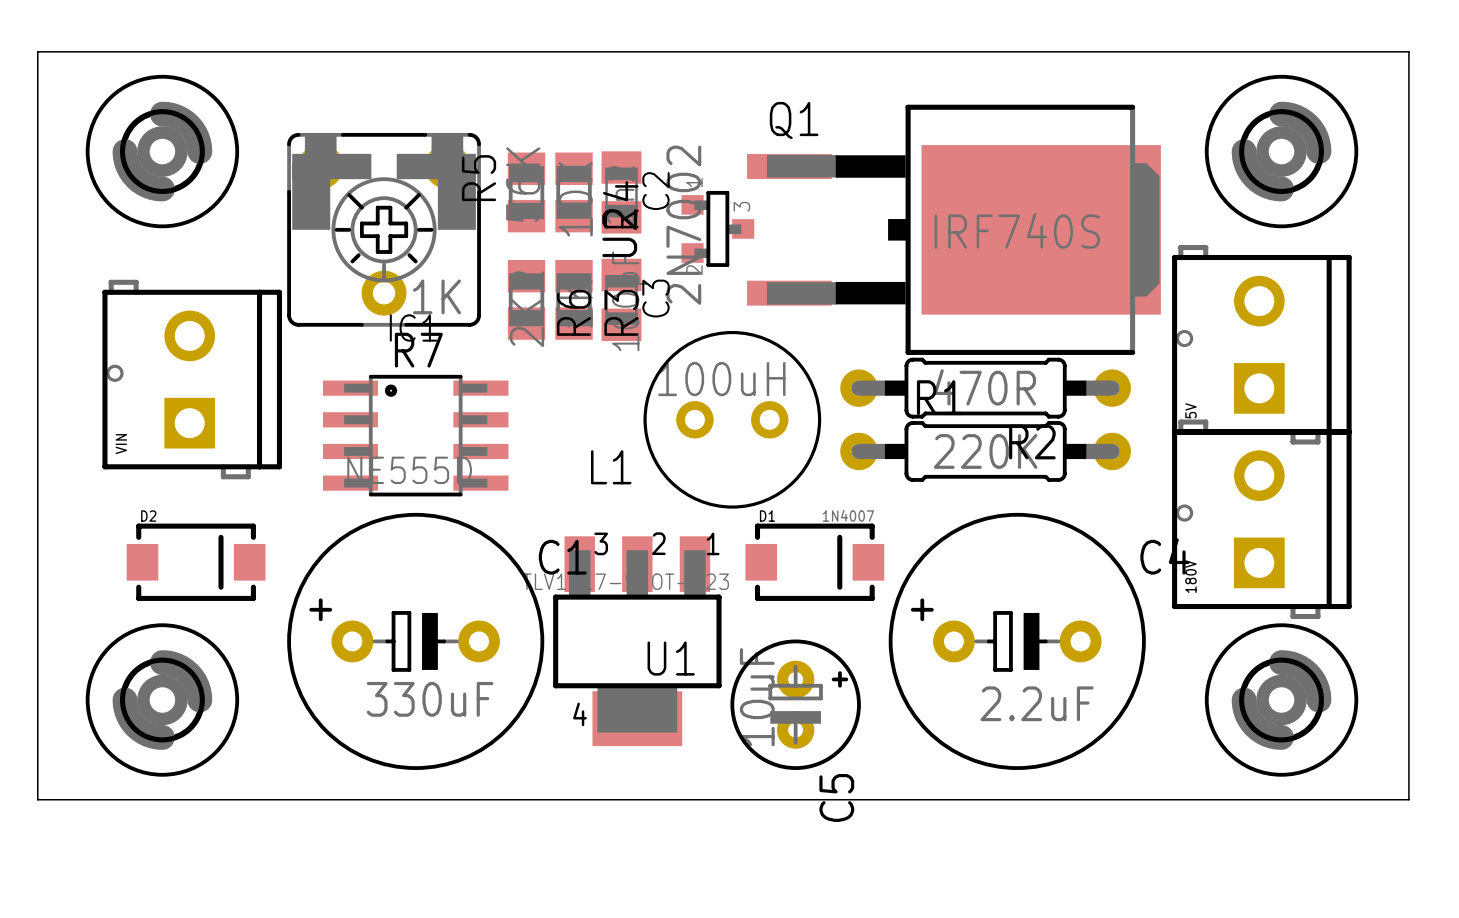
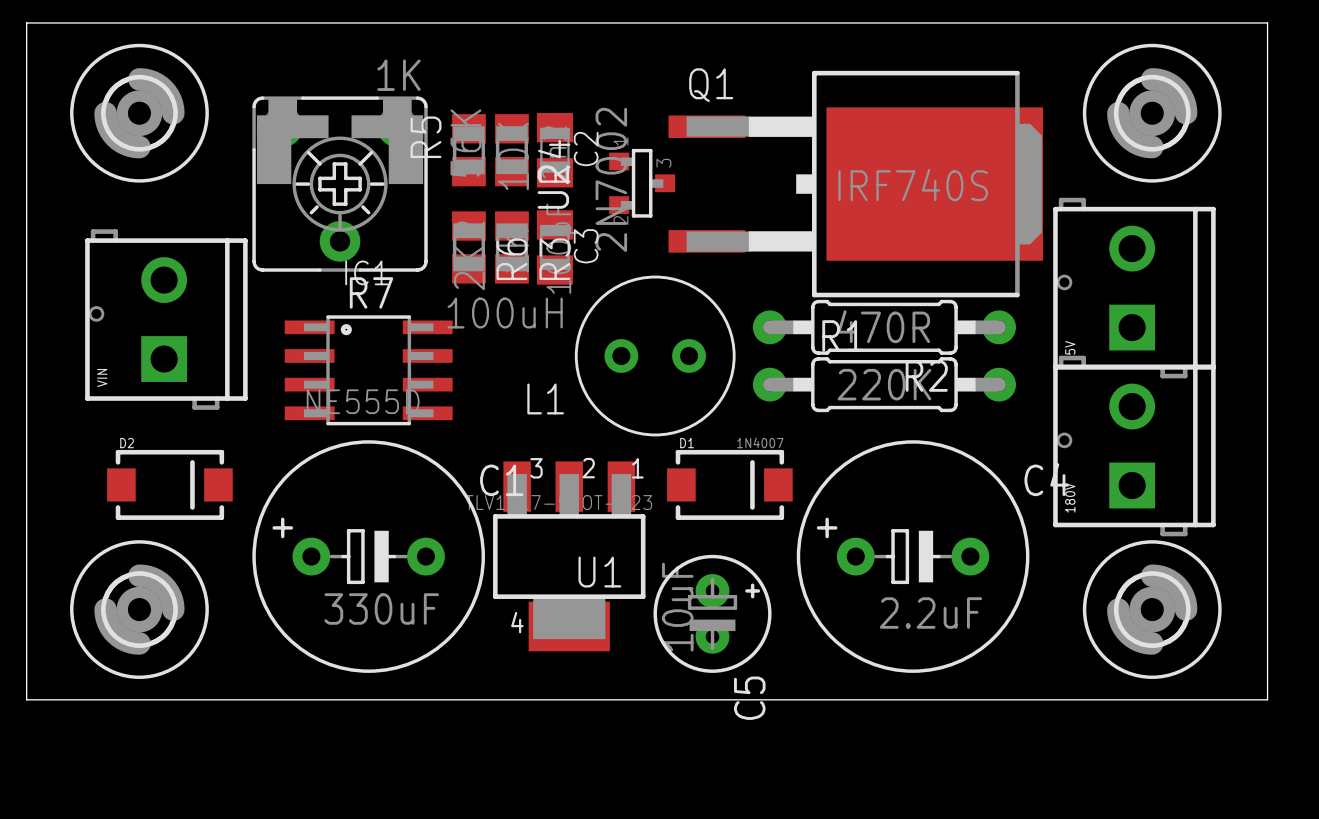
R7 value position: 1K (436, 296) -> 1K (398, 75)
L1 value position: 100uH (721, 379) -> 100uH (505, 313)

